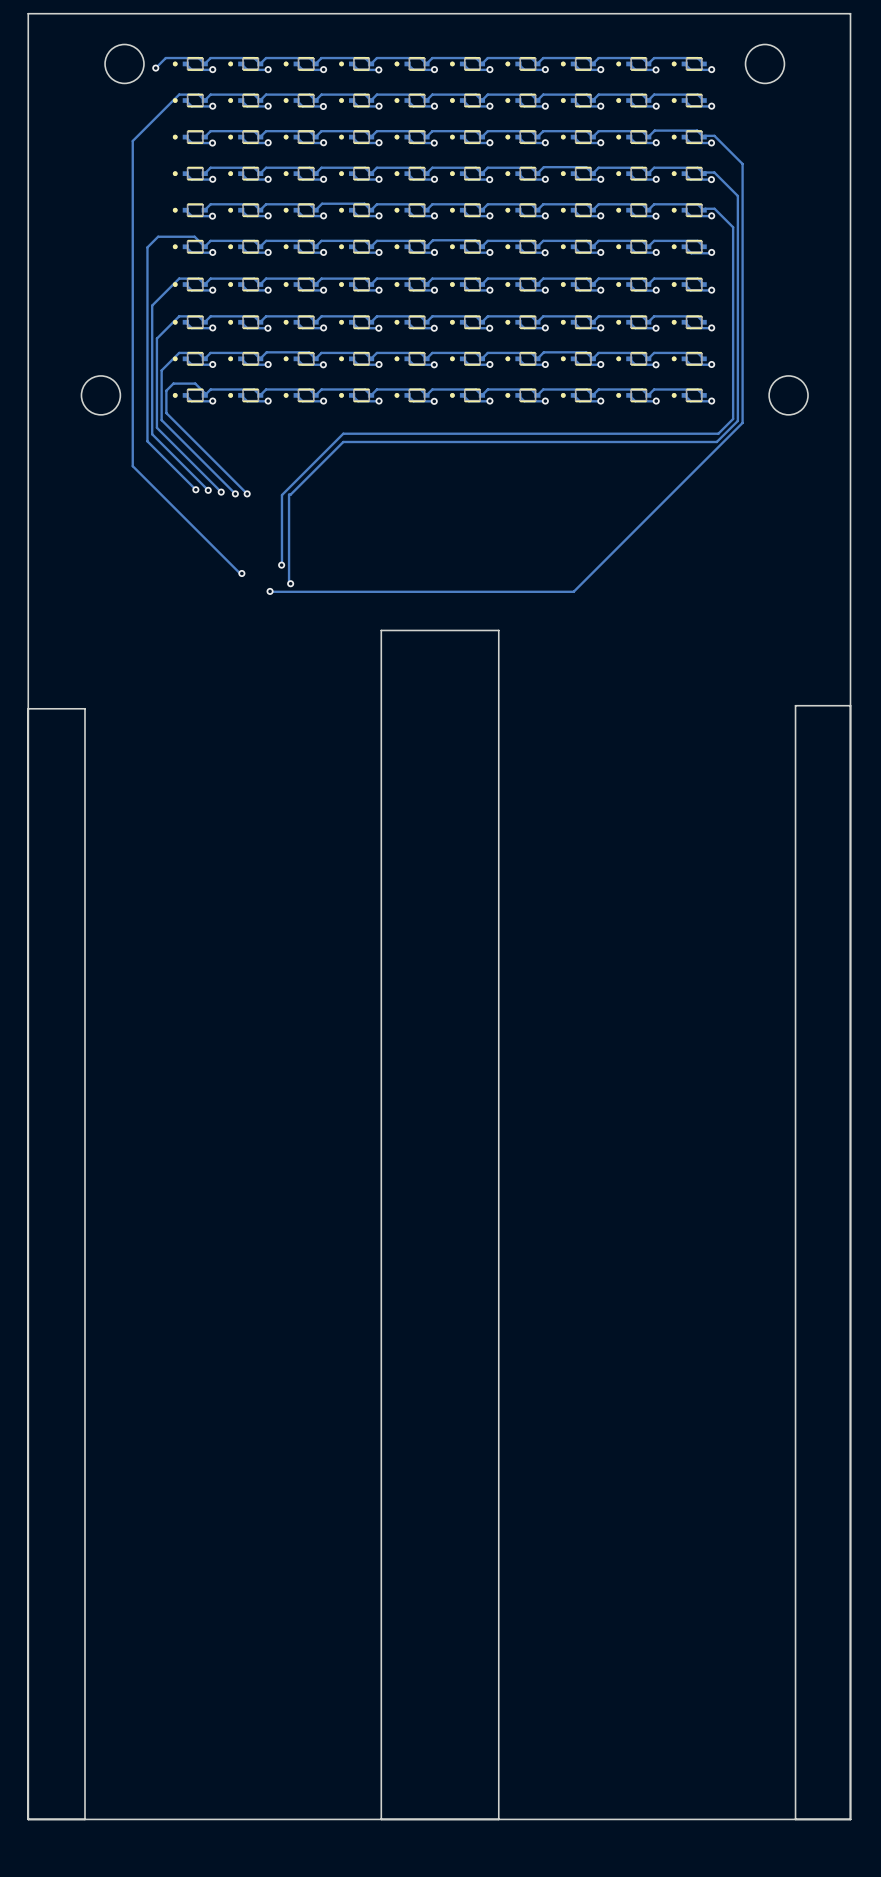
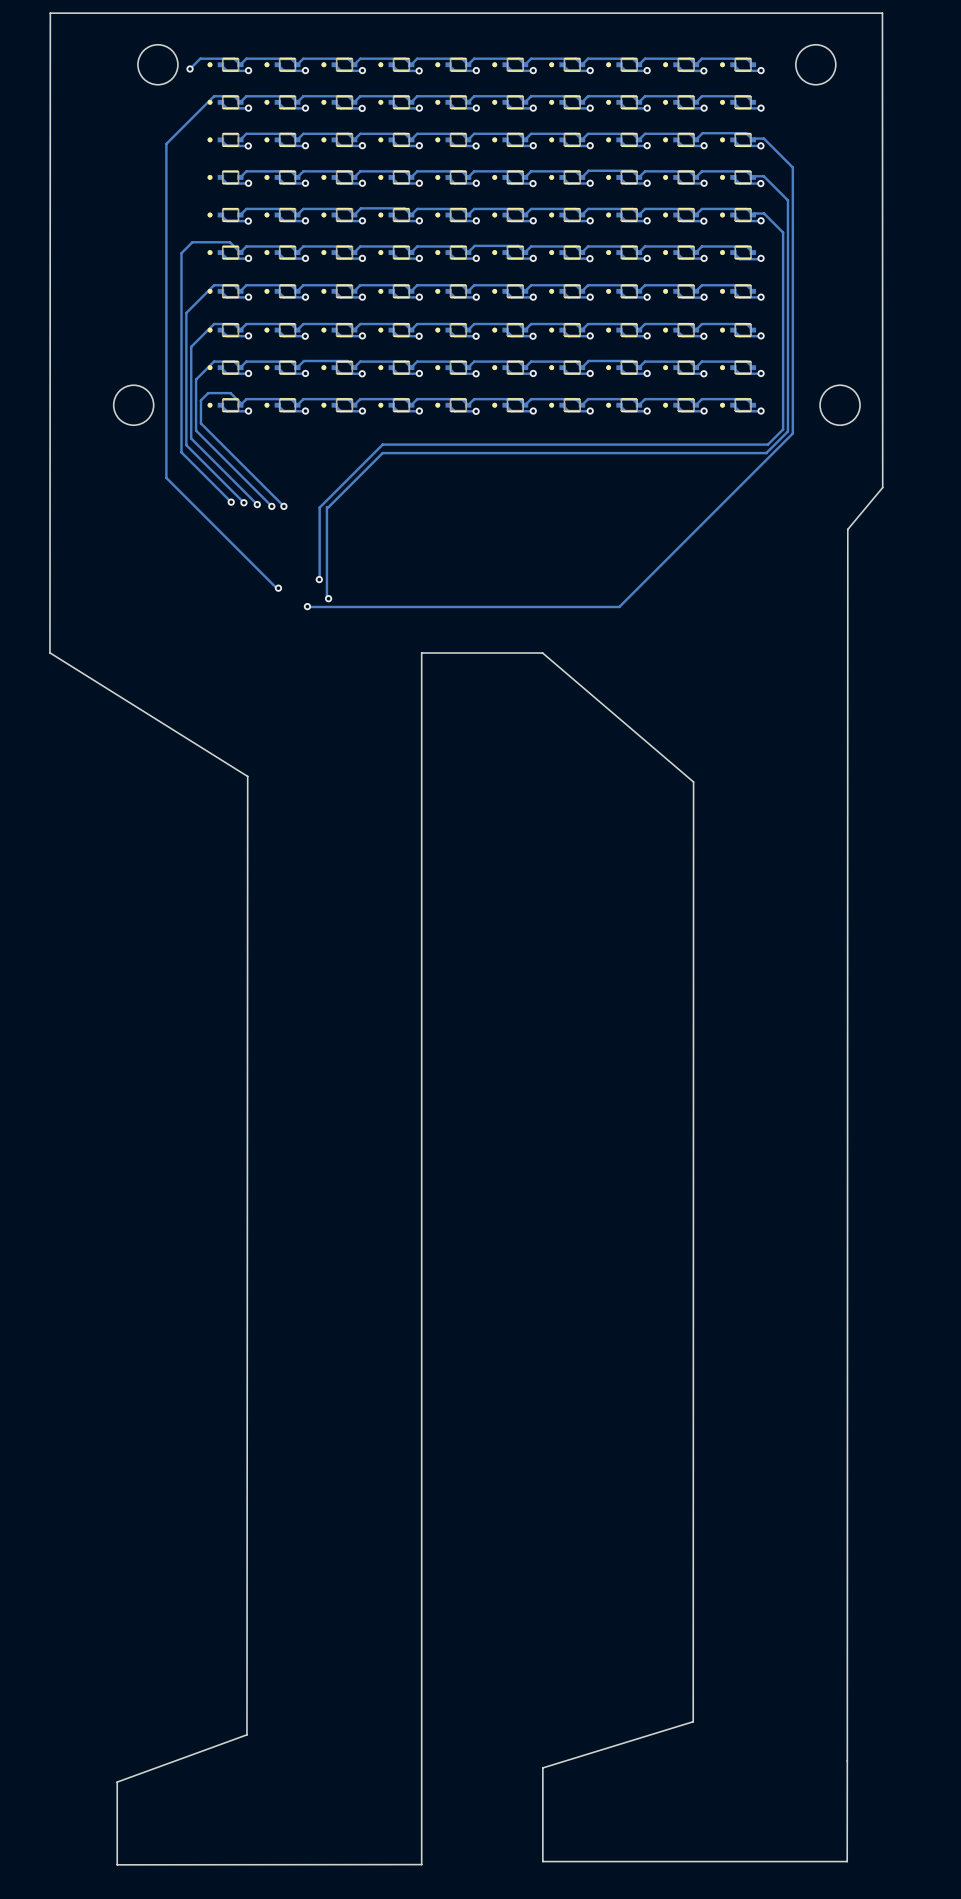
board edge: (829, 13) (850, 13) (850, 1819) (28, 1819) (28, 13) -> (882, 13) (882, 487) (847, 529) (847, 1861) (542, 1861) (542, 1767) (693, 1721) (693, 782) (542, 653) (421, 653)
board edge: (381, 636) (381, 630) (498, 630) (498, 1819) -> none
board edge: (850, 705) (795, 705) (795, 1819) -> none
board edge: (28, 708) (85, 708) (85, 1819) -> none
board edge: (381, 1816) (381, 1819) -> (421, 1864) (117, 1864) (117, 1782) (246, 1734) (247, 776) (49, 652) (50, 13) (59, 13)

